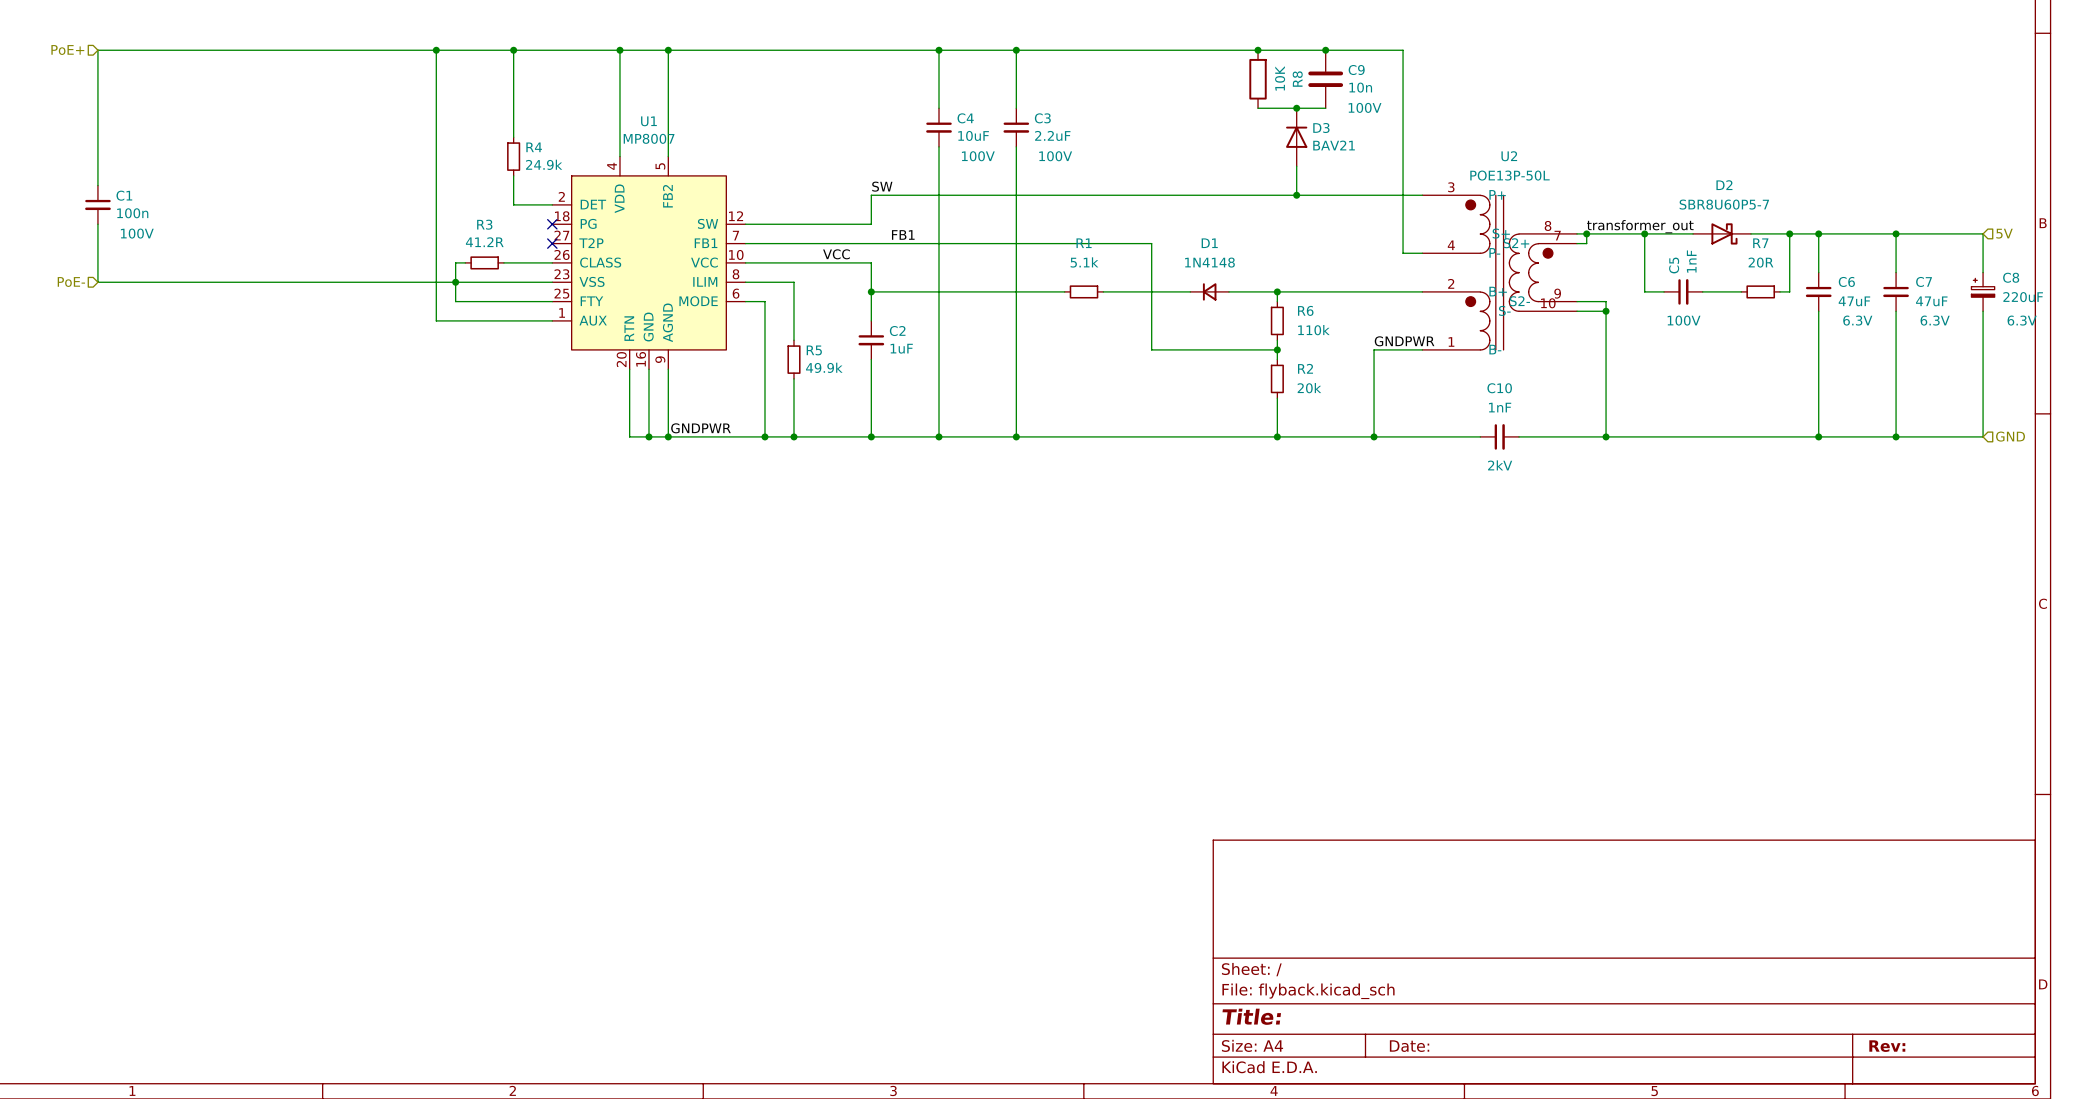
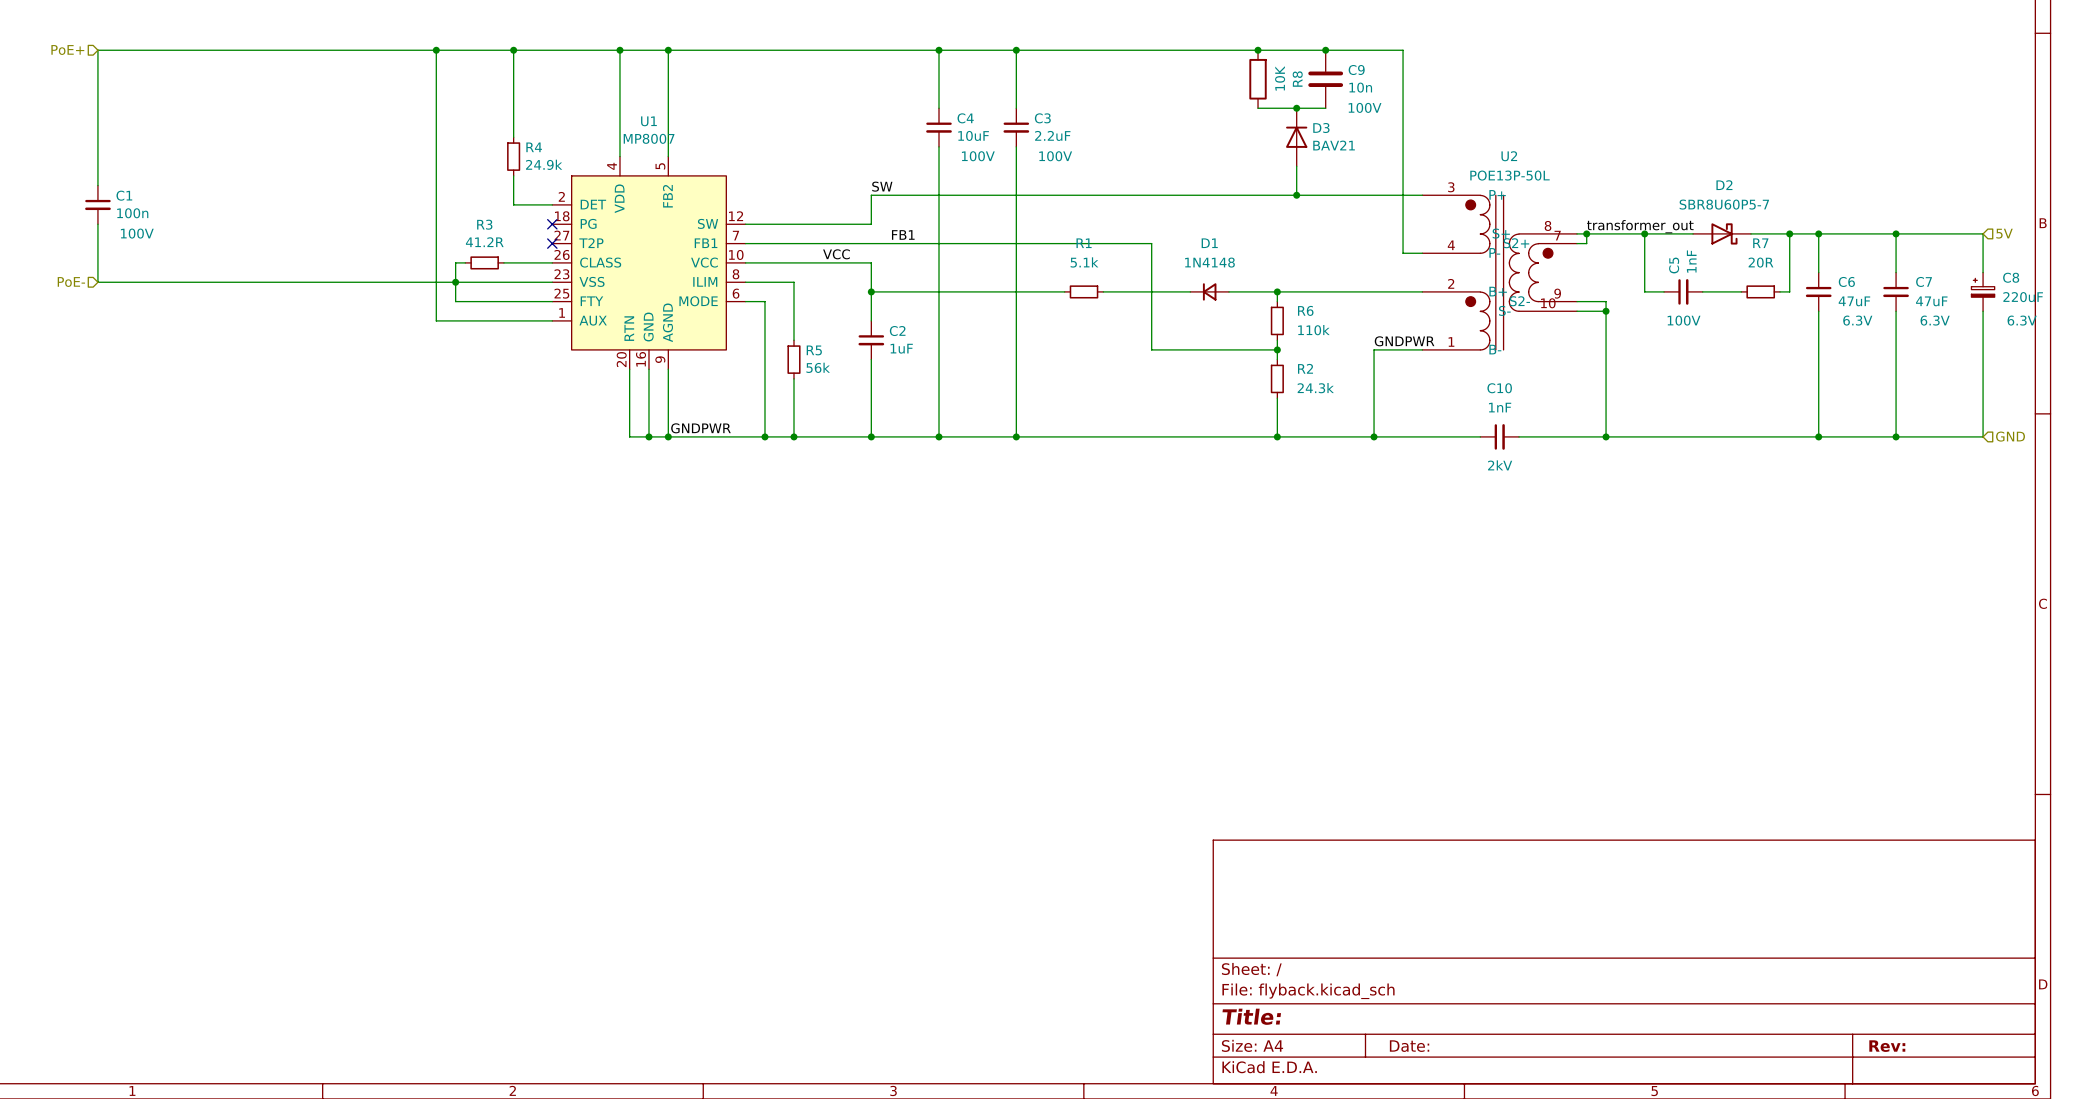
R5 value: 49.9k (824, 367) -> 56k (818, 367)
R2 value: 20k (1309, 388) -> 24.3k (1315, 388)

